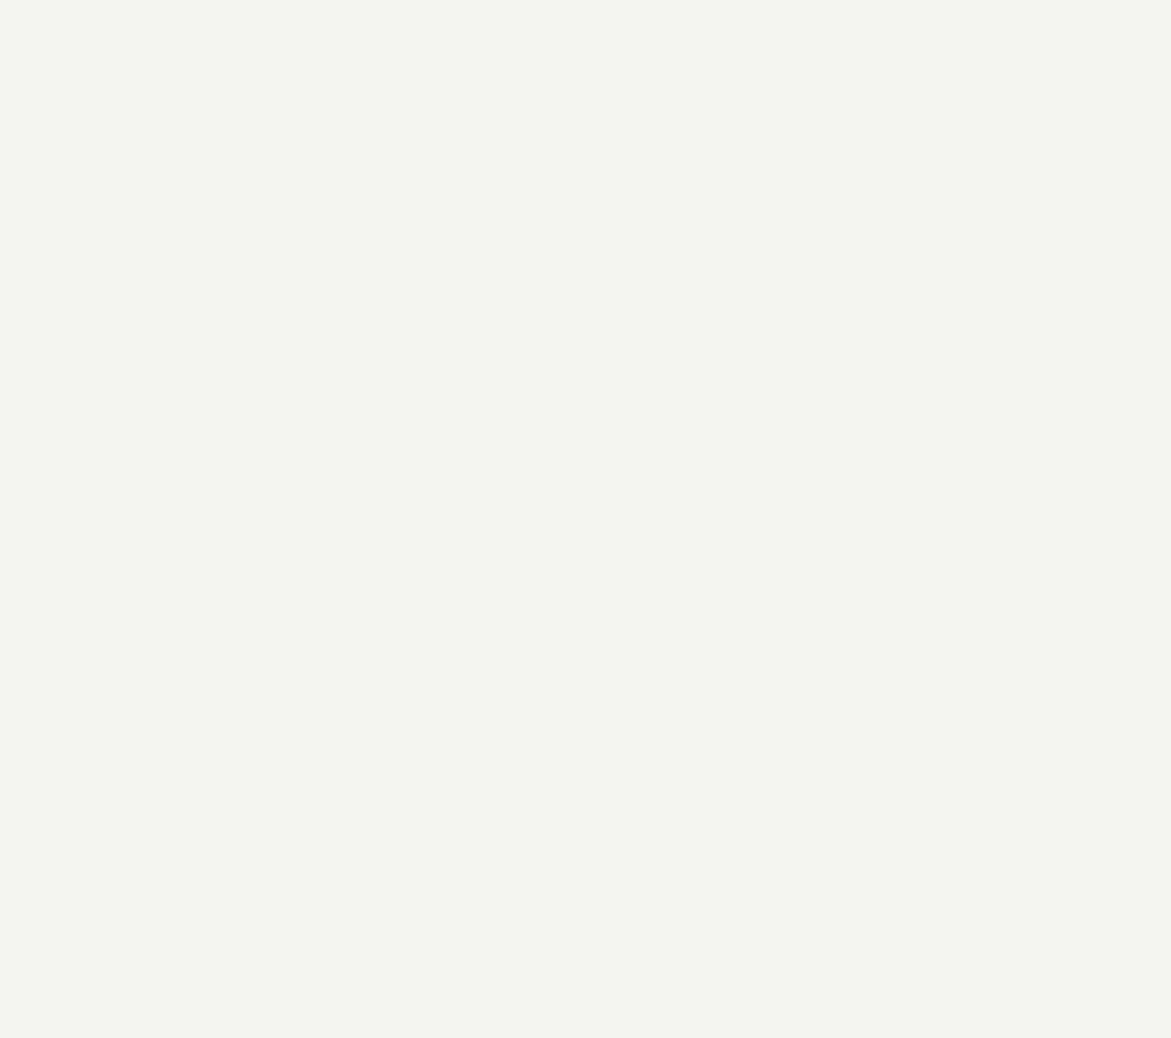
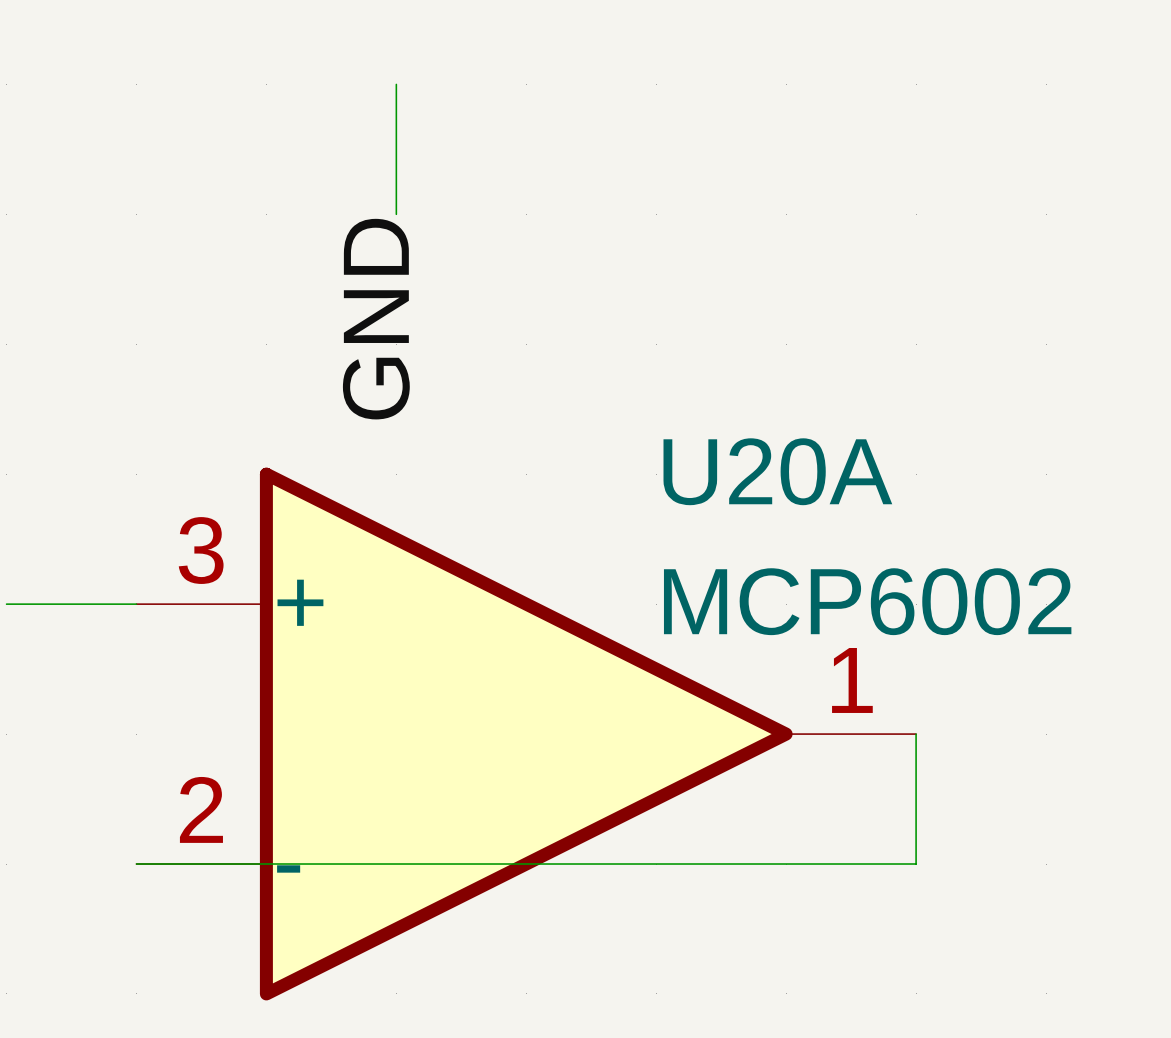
wire: none -> (396, 84) (396, 214)
label: none -> GND (376, 319)
wire: none -> (6, 604) (136, 604)
U20A: none -> MCP6002 (526, 734)
wire: none -> (916, 734) (916, 864) (136, 864)

